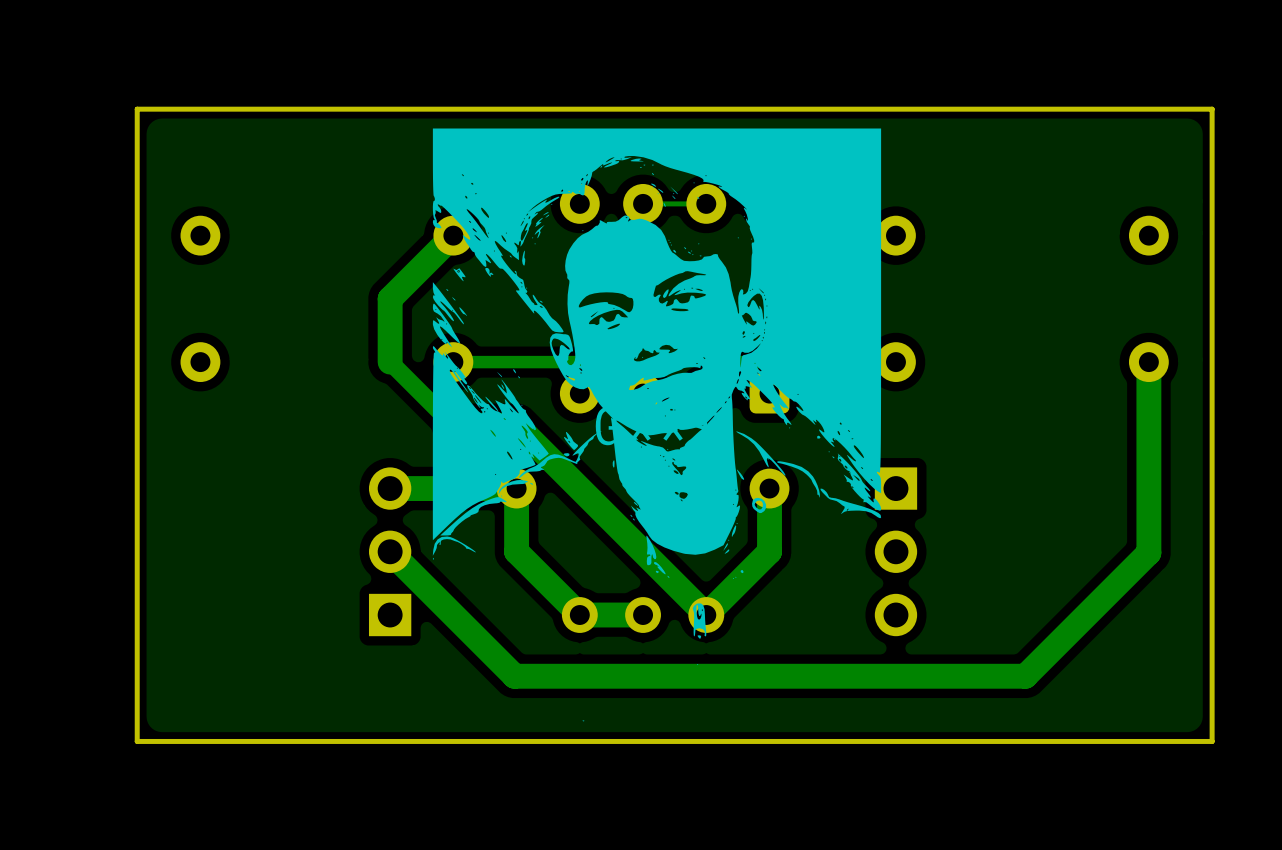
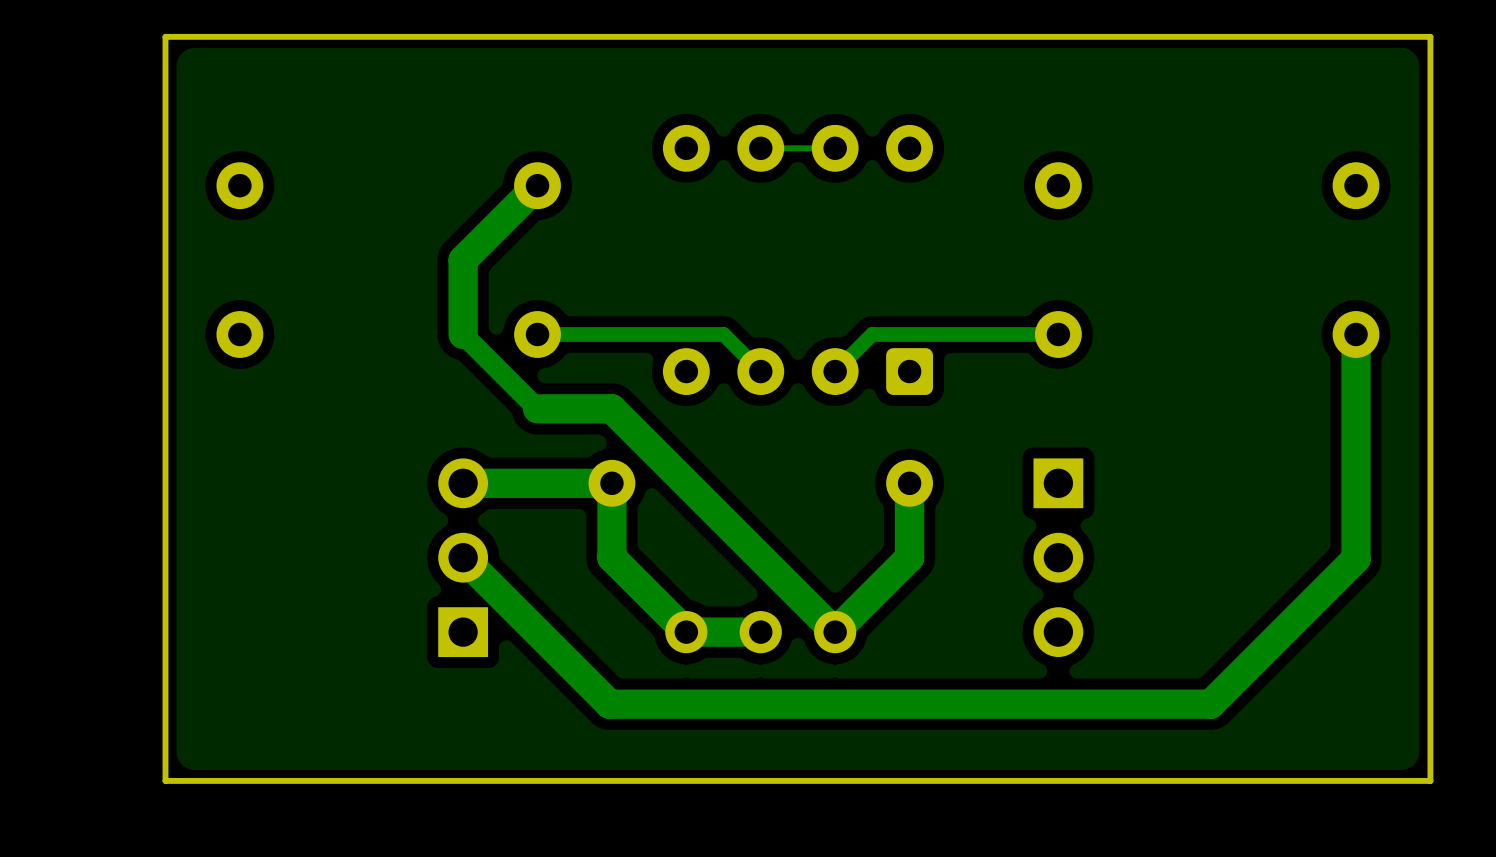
part: (656, 424) -> none

